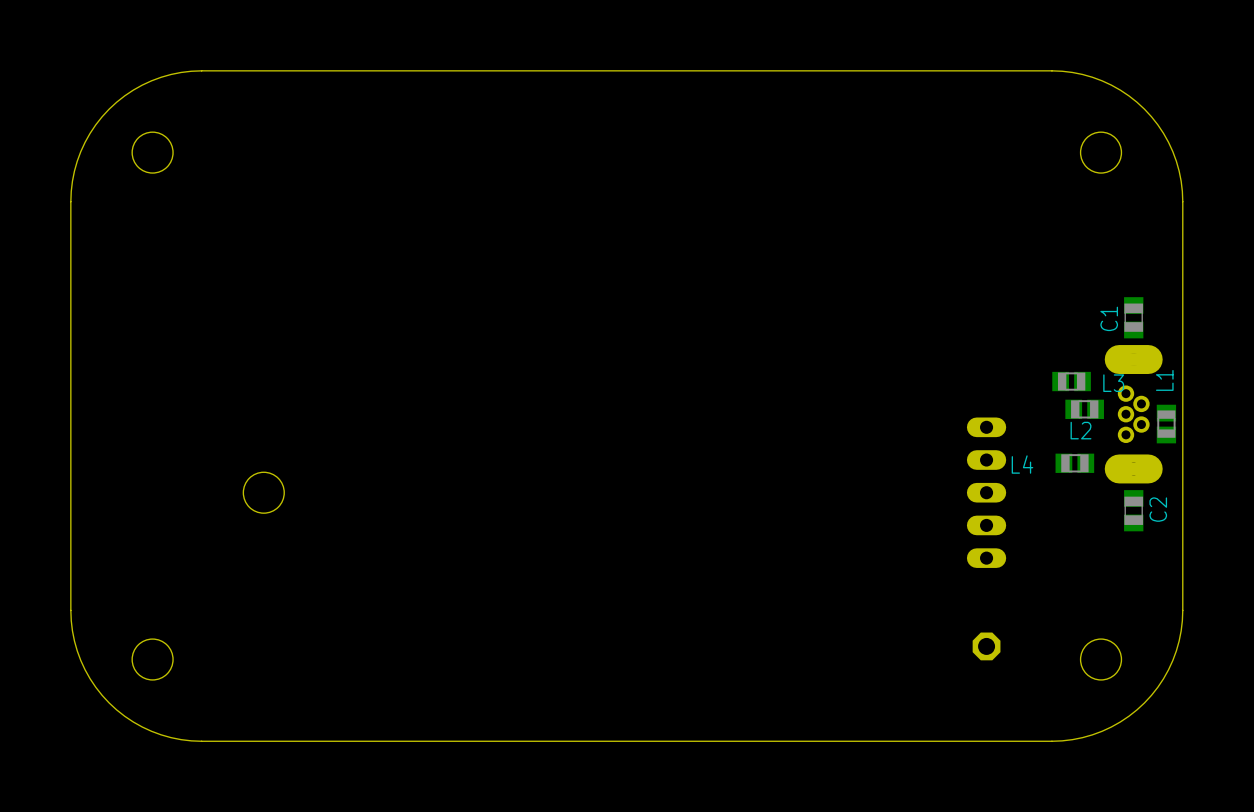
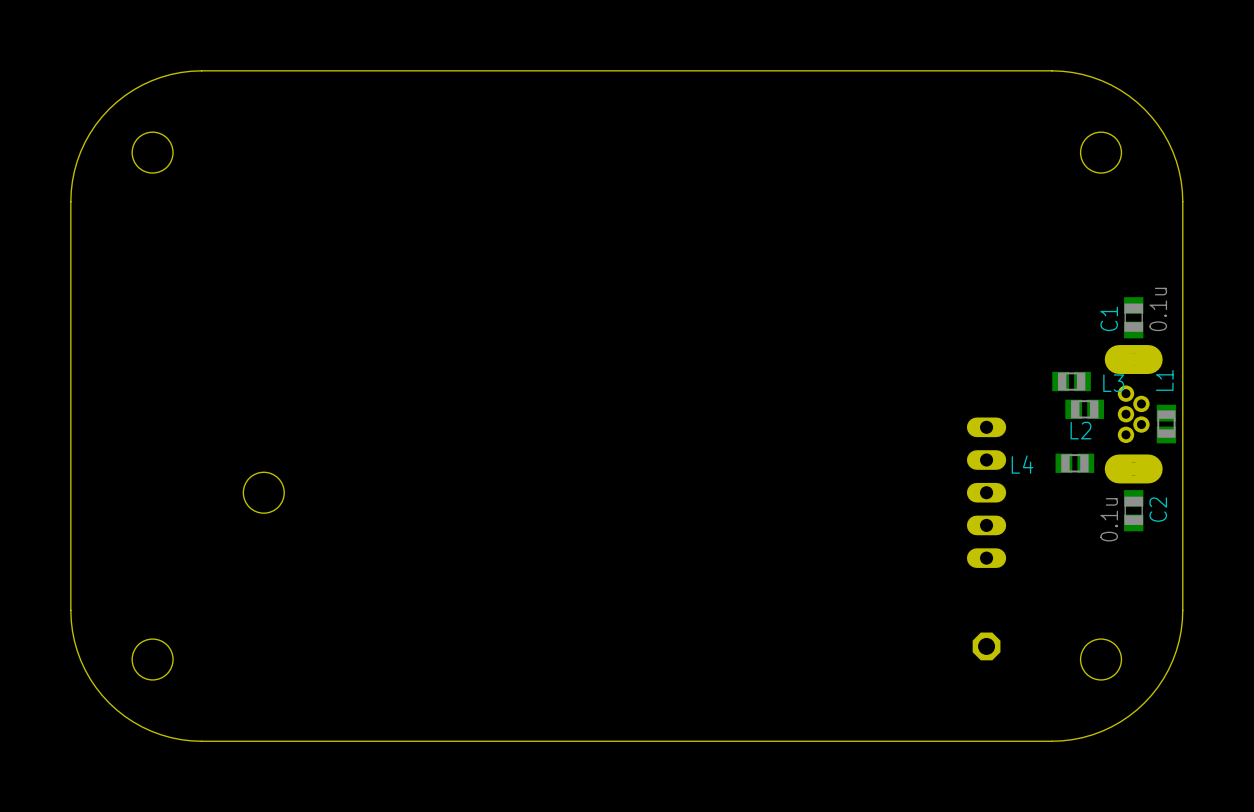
C1 value: none -> 0.1u (1158, 309)
C2 value: none -> 0.1u (1109, 519)

